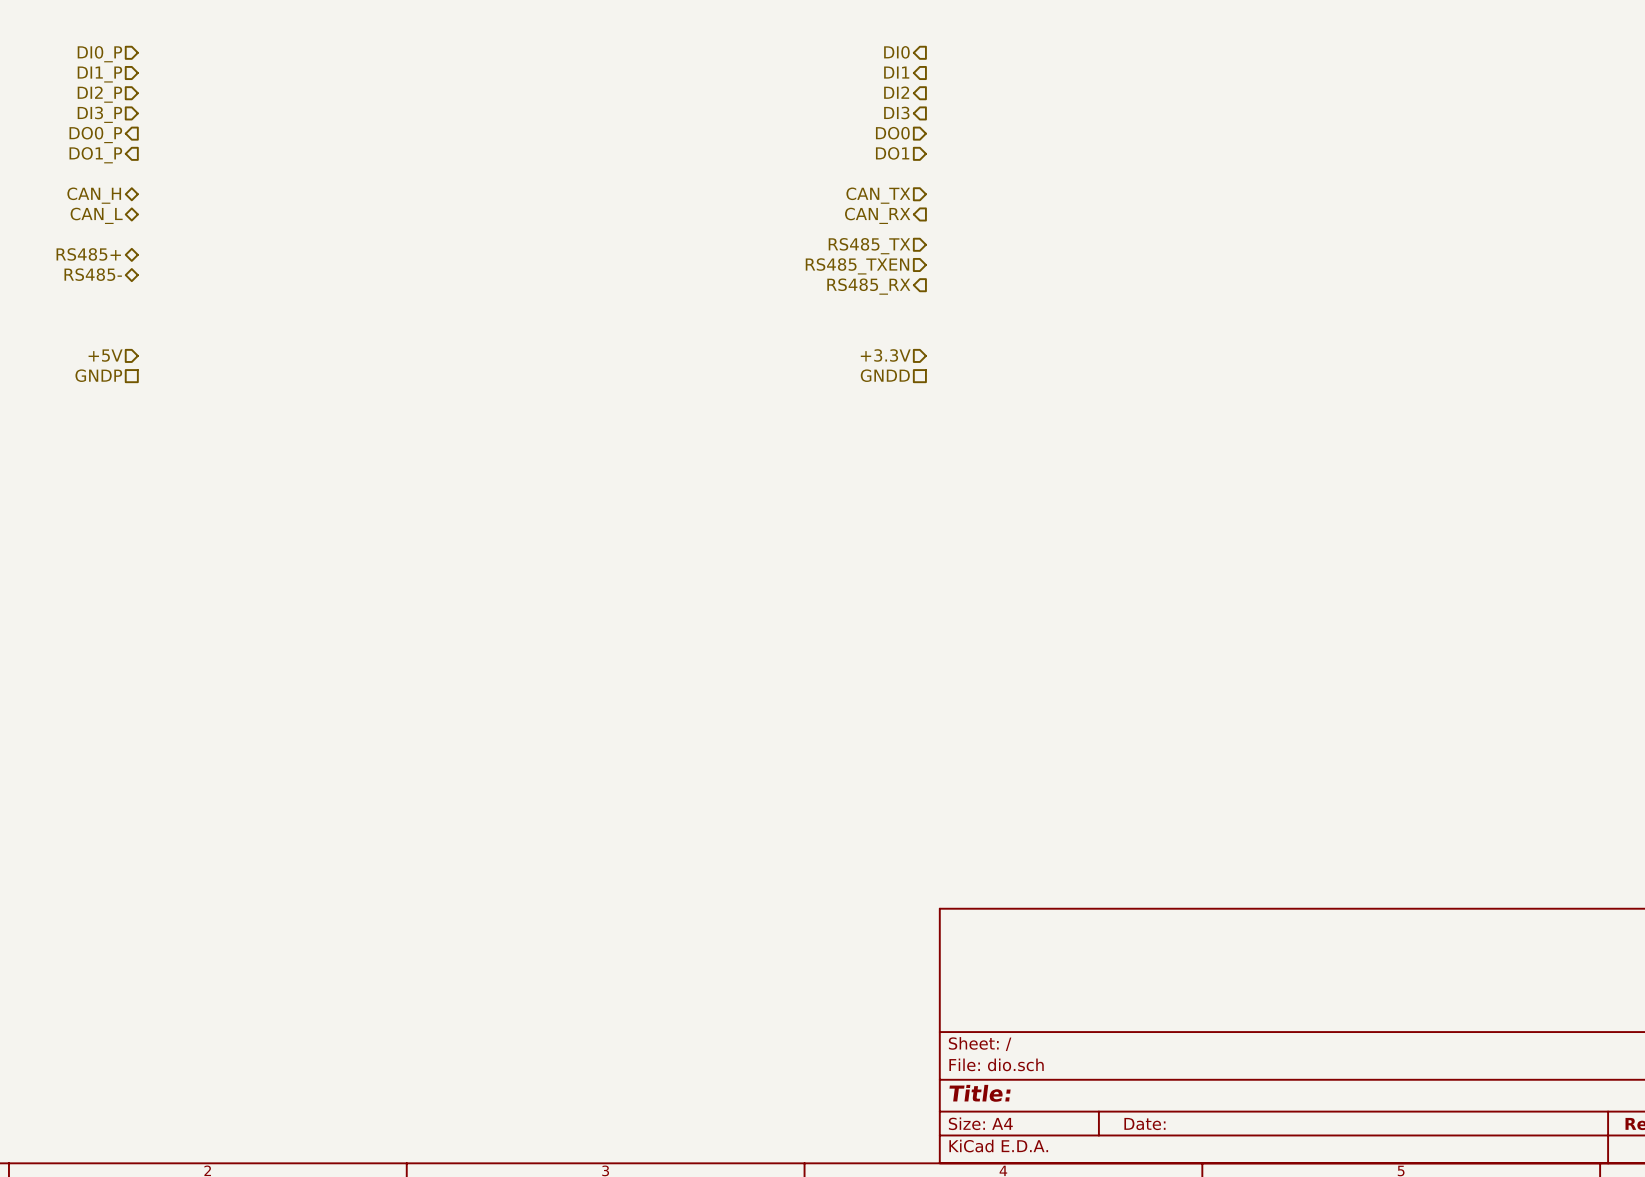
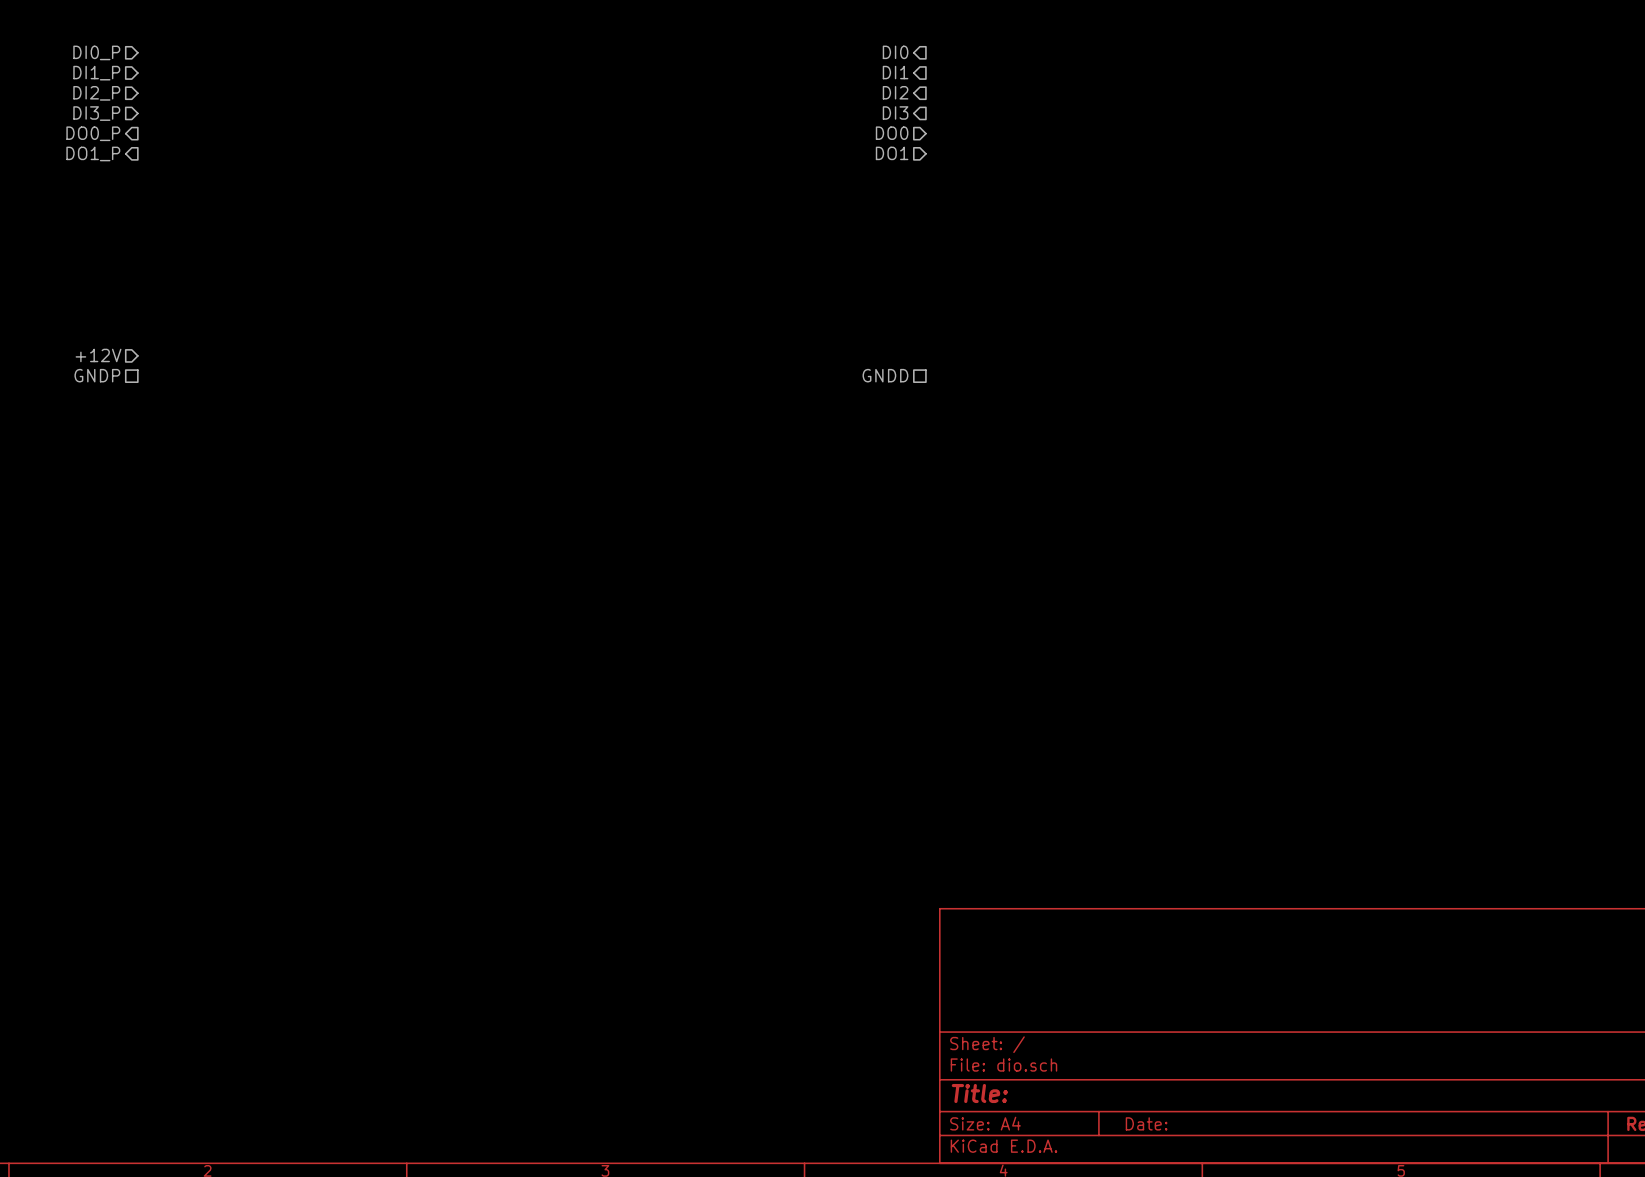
hierarchical label: CAN_H (94, 195) -> none
hierarchical label: CAN_TX (878, 195) -> none
hierarchical label: CAN_L (96, 215) -> none
hierarchical label: CAN_RX (877, 215) -> none
hierarchical label: RS485_TX (869, 246) -> none
hierarchical label: RS485+ (88, 254) -> none
hierarchical label: RS485_TXEN (857, 266) -> none
hierarchical label: RS485- (93, 274) -> none
hierarchical label: RS485_RX (868, 286) -> none
hierarchical label: +5V (105, 355) -> +12V (98, 355)
hierarchical label: +3.3V (885, 355) -> none

